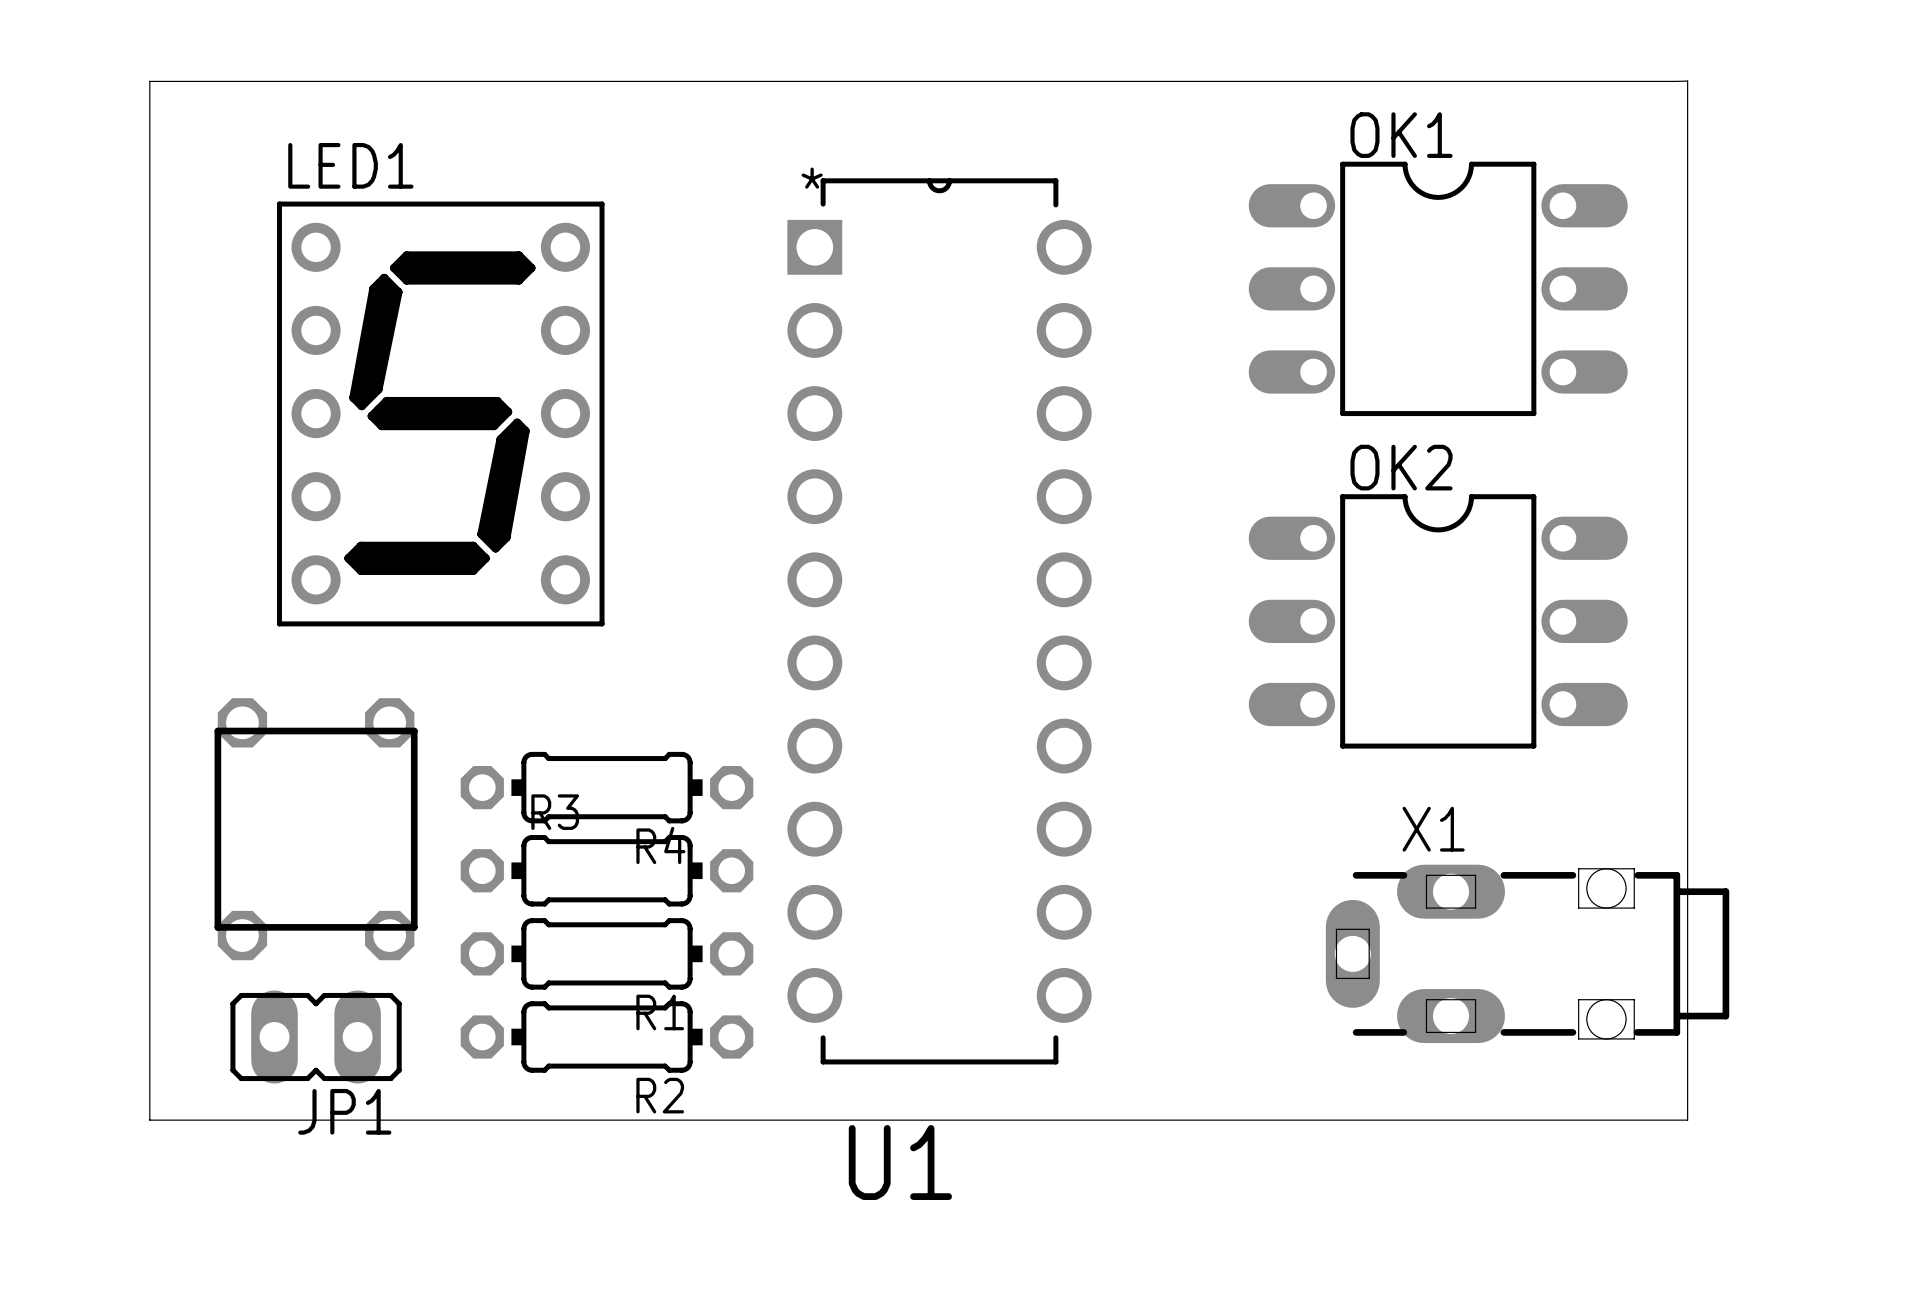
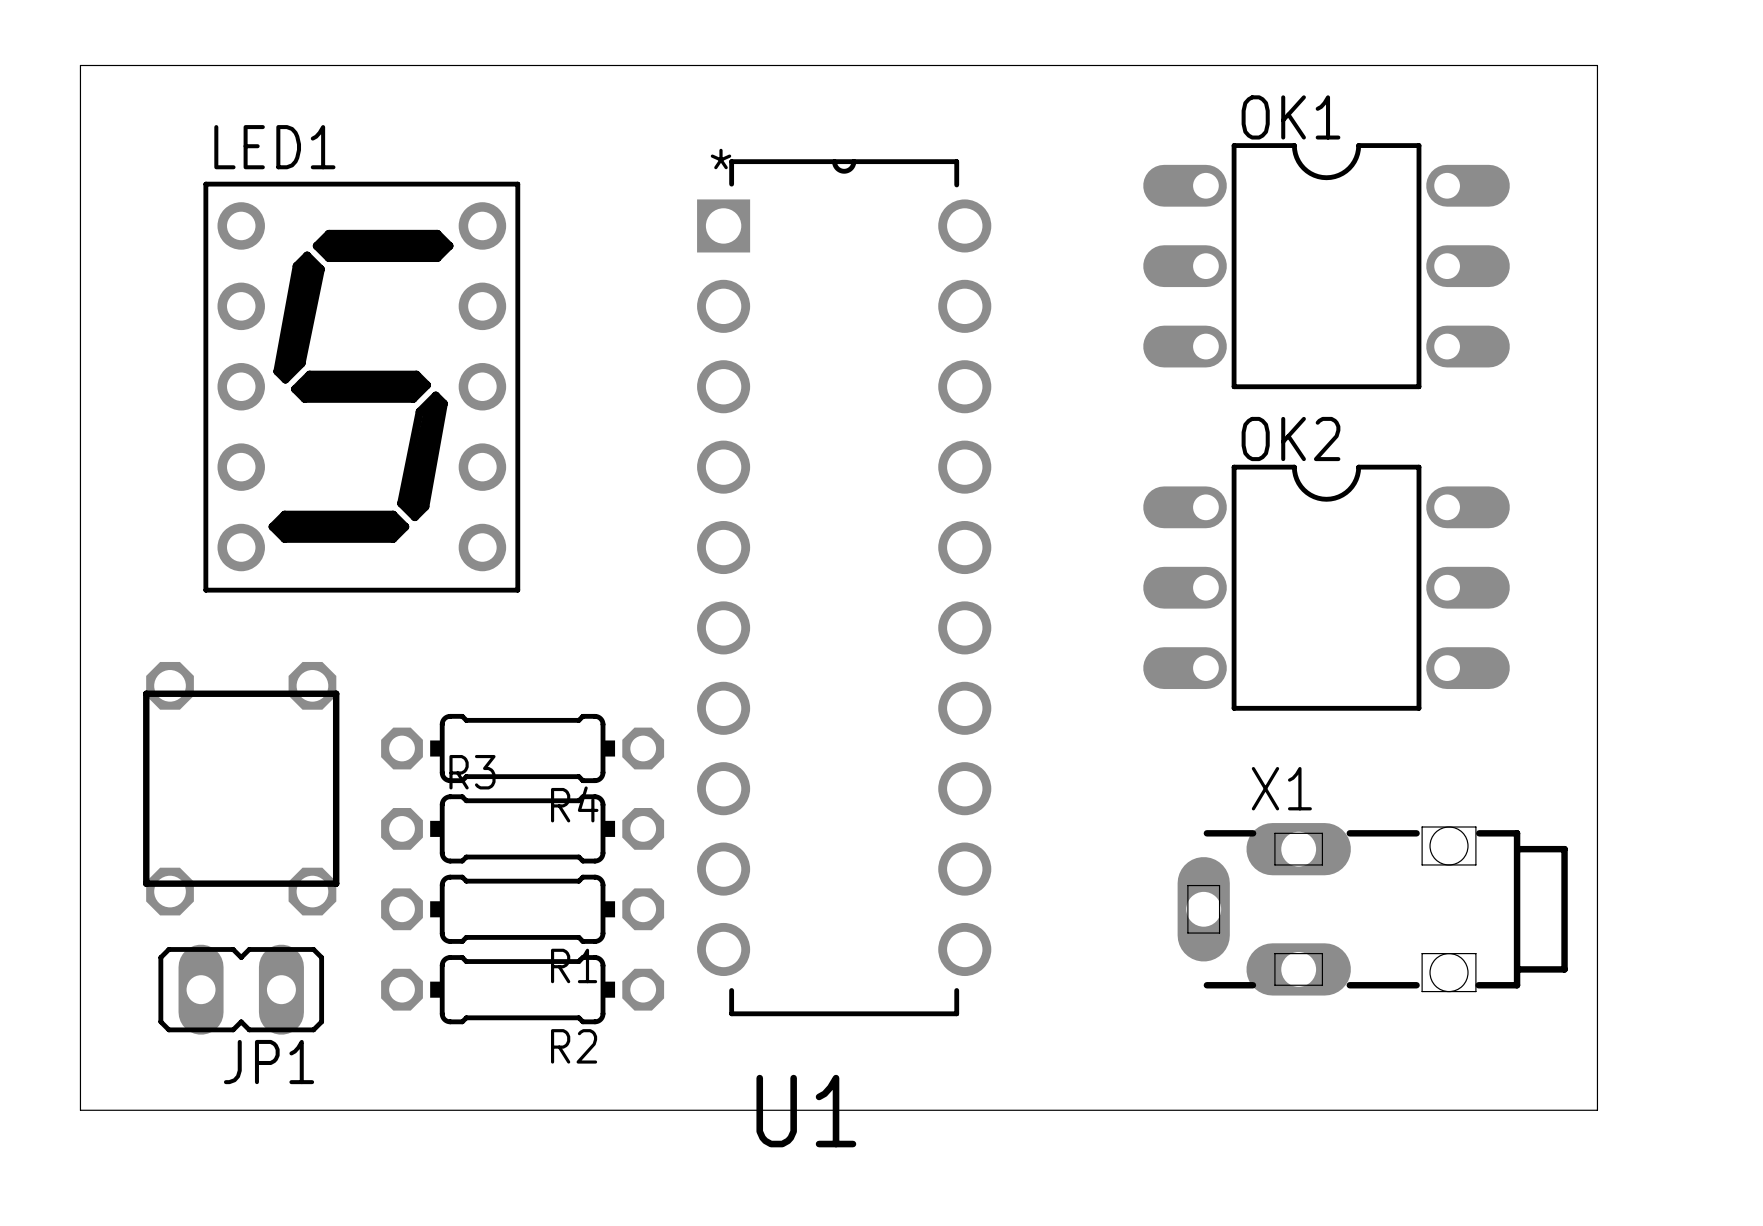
board edge: (1676, 81) (1687, 81) (1687, 1120) (149, 1120) -> (1557, 65) (1597, 65) (1597, 1110) (80, 1110) (80, 1070)
X1 position: (1527, 953) -> (1372, 909)

